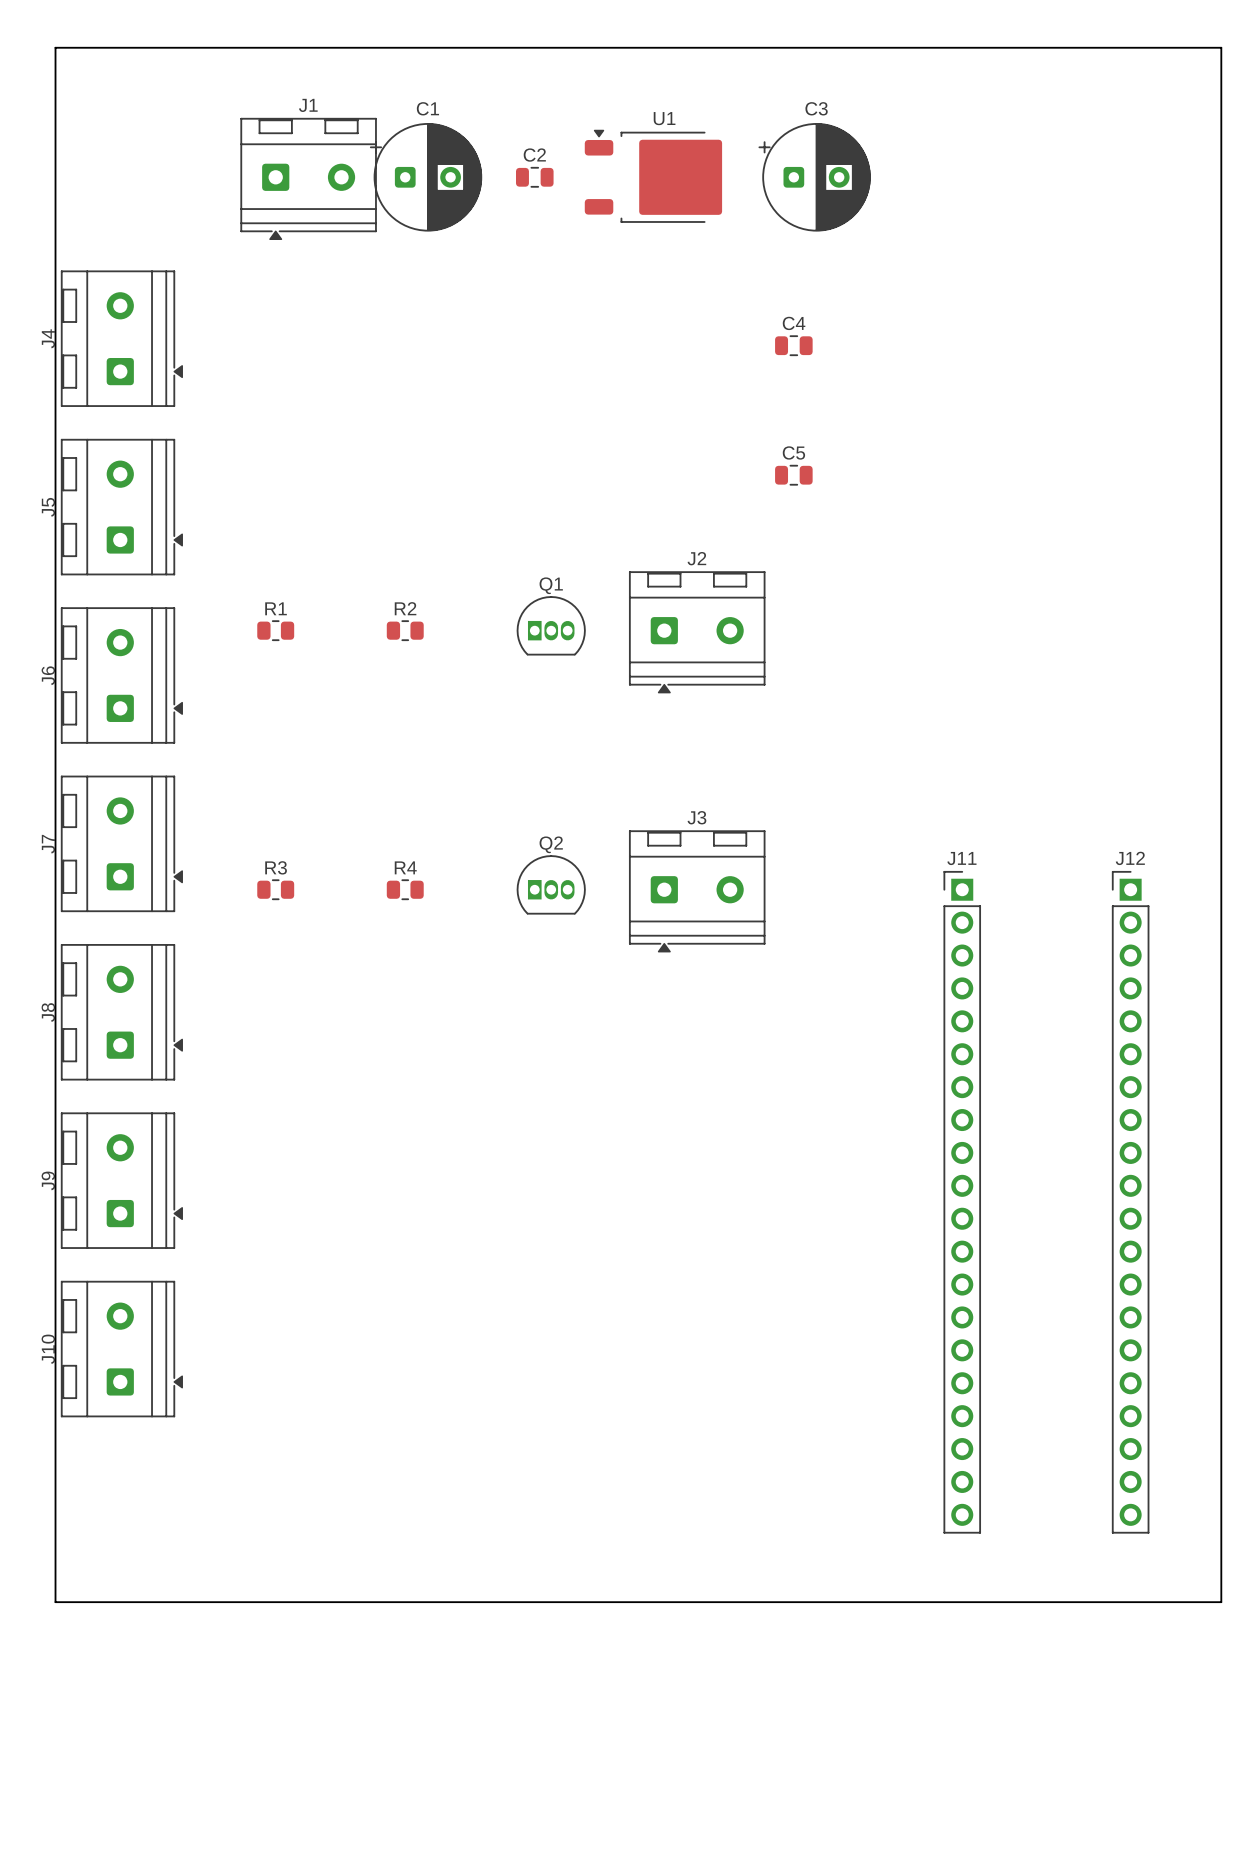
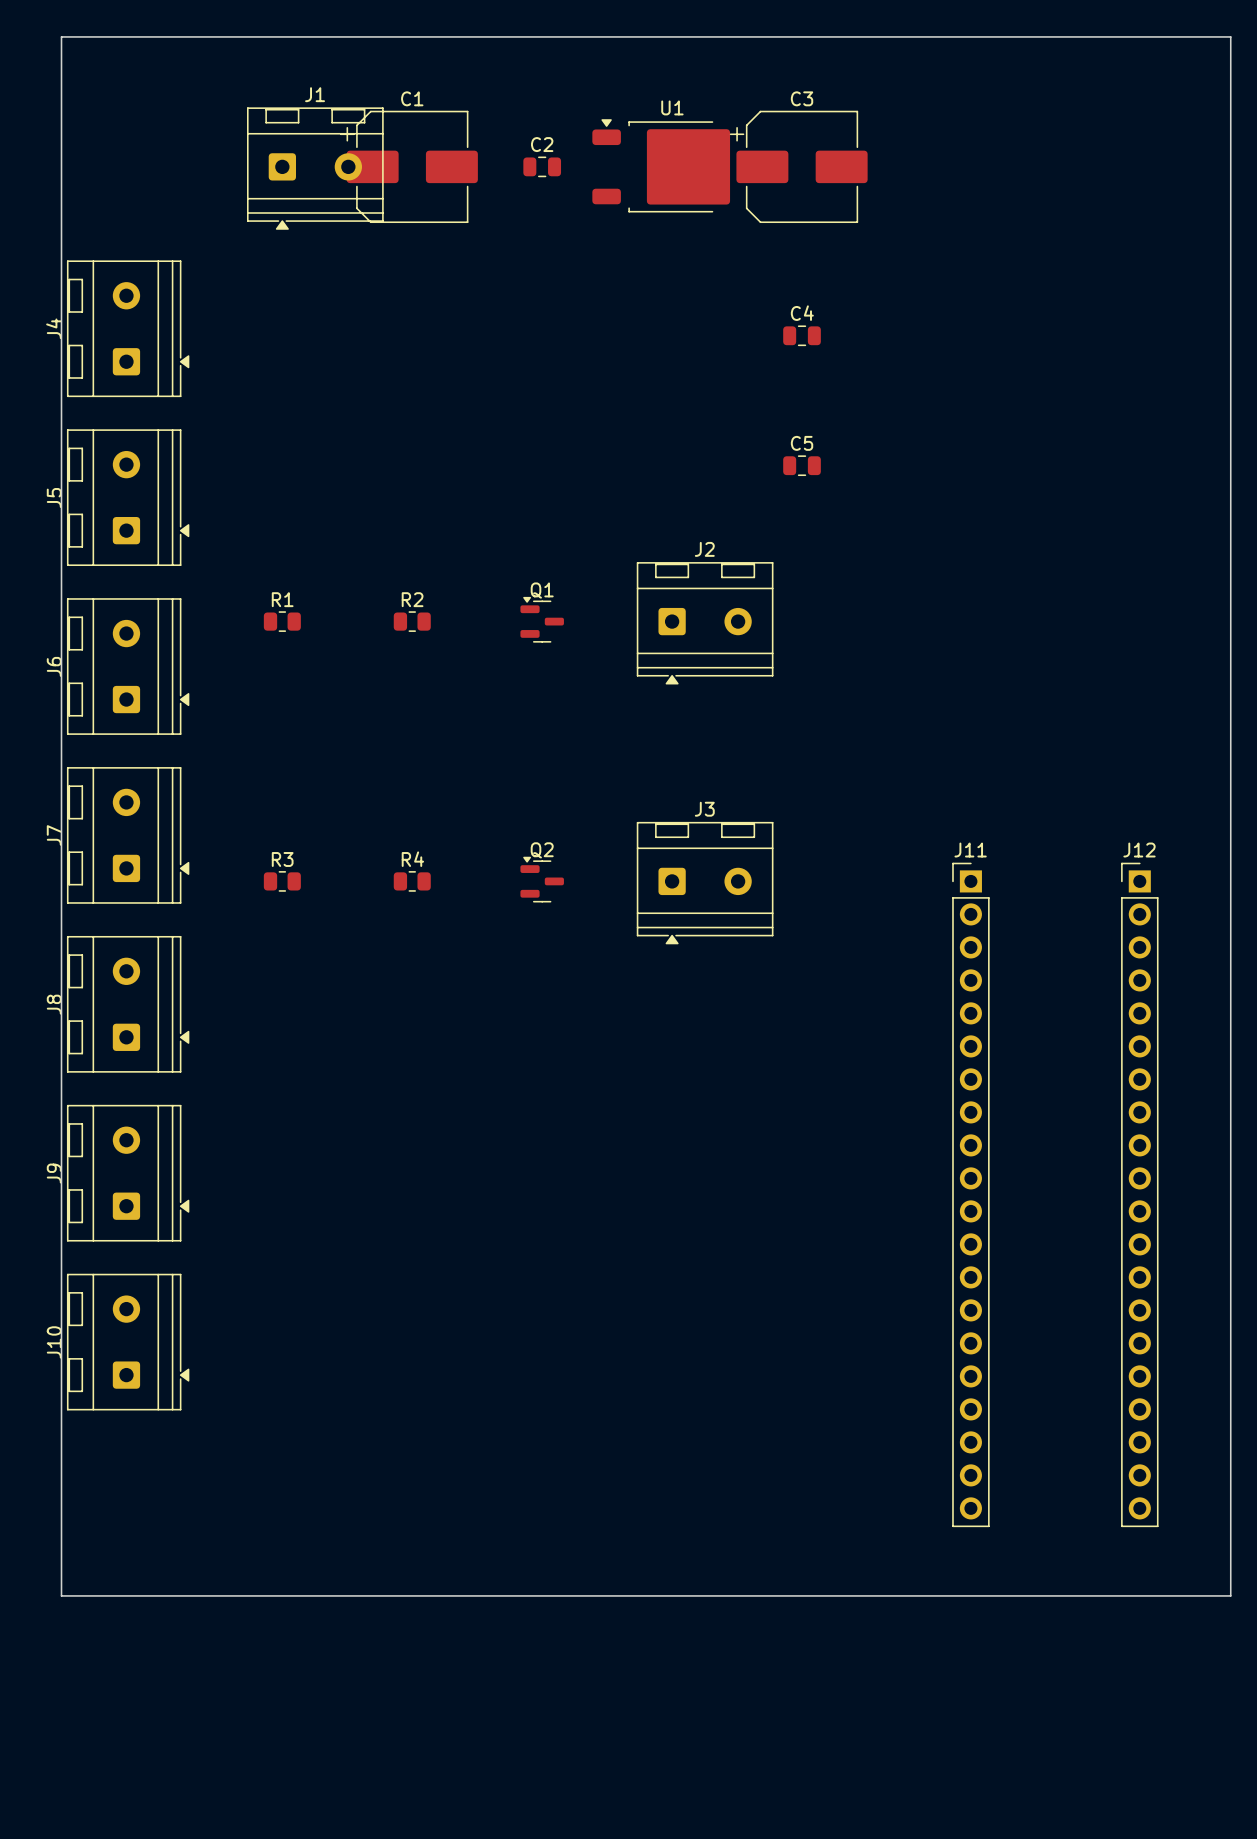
C1 footprint: [370, 123, 483, 232] -> [340, 110, 478, 224]
C3 footprint: [758, 123, 871, 232] -> [729, 110, 868, 224]
Q1 footprint: [516, 596, 586, 656] -> [520, 596, 564, 643]
Q2 footprint: [516, 855, 586, 915] -> [520, 856, 564, 903]

